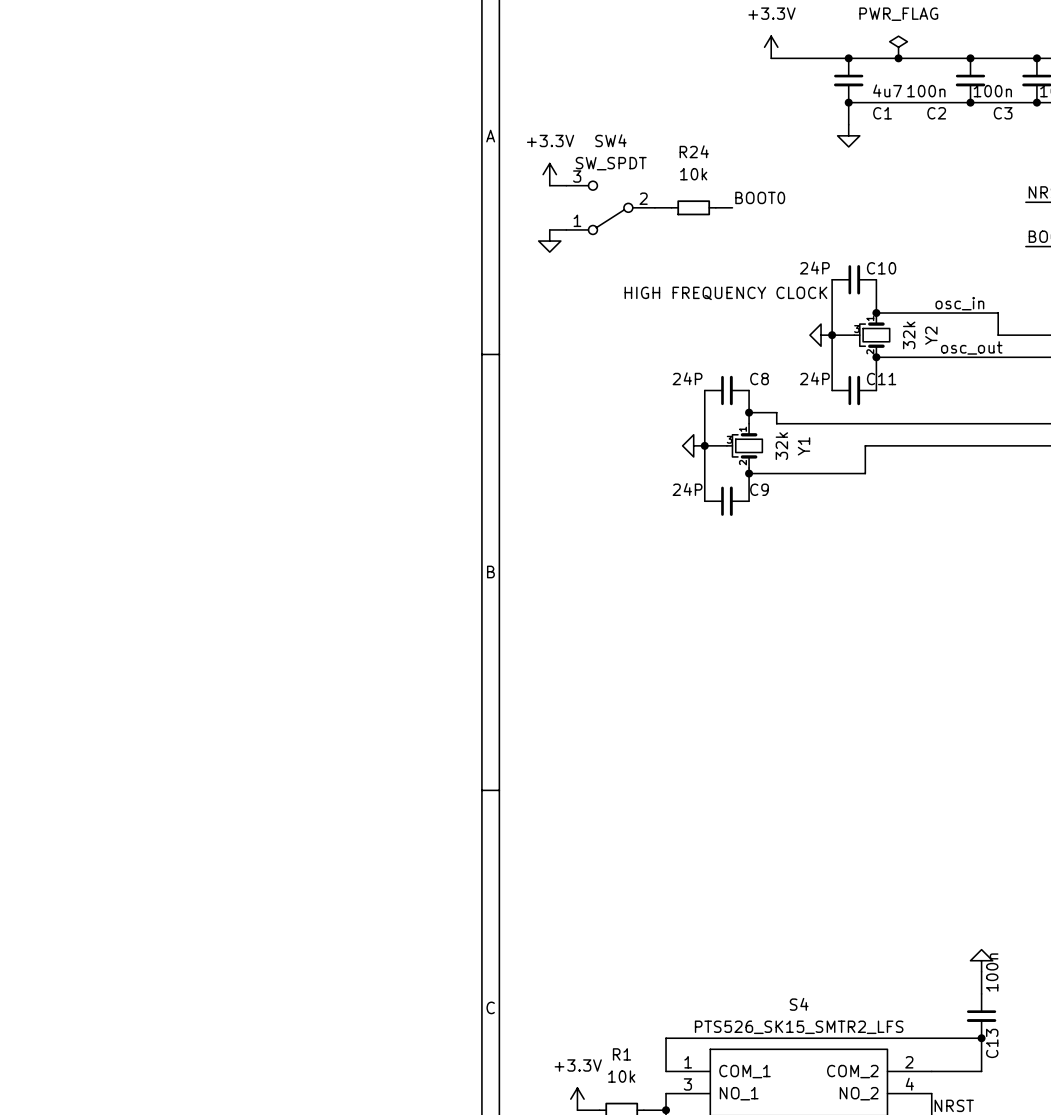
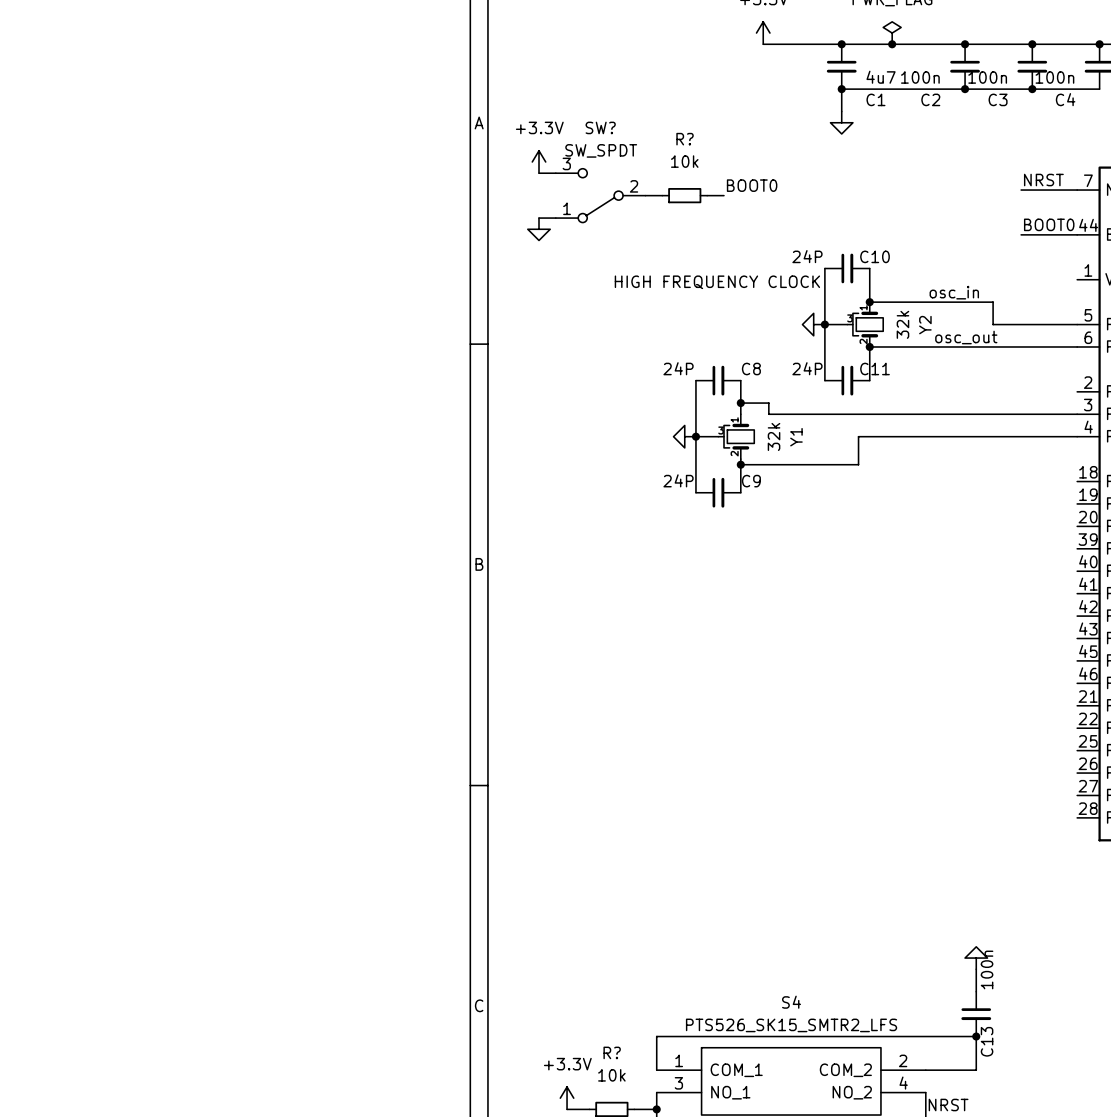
SW4 name: SW4 (610, 140) -> SW? (600, 127)
R24 name: R24 (694, 151) -> R? (685, 139)
R1 name: R1 (621, 1054) -> R? (612, 1052)

